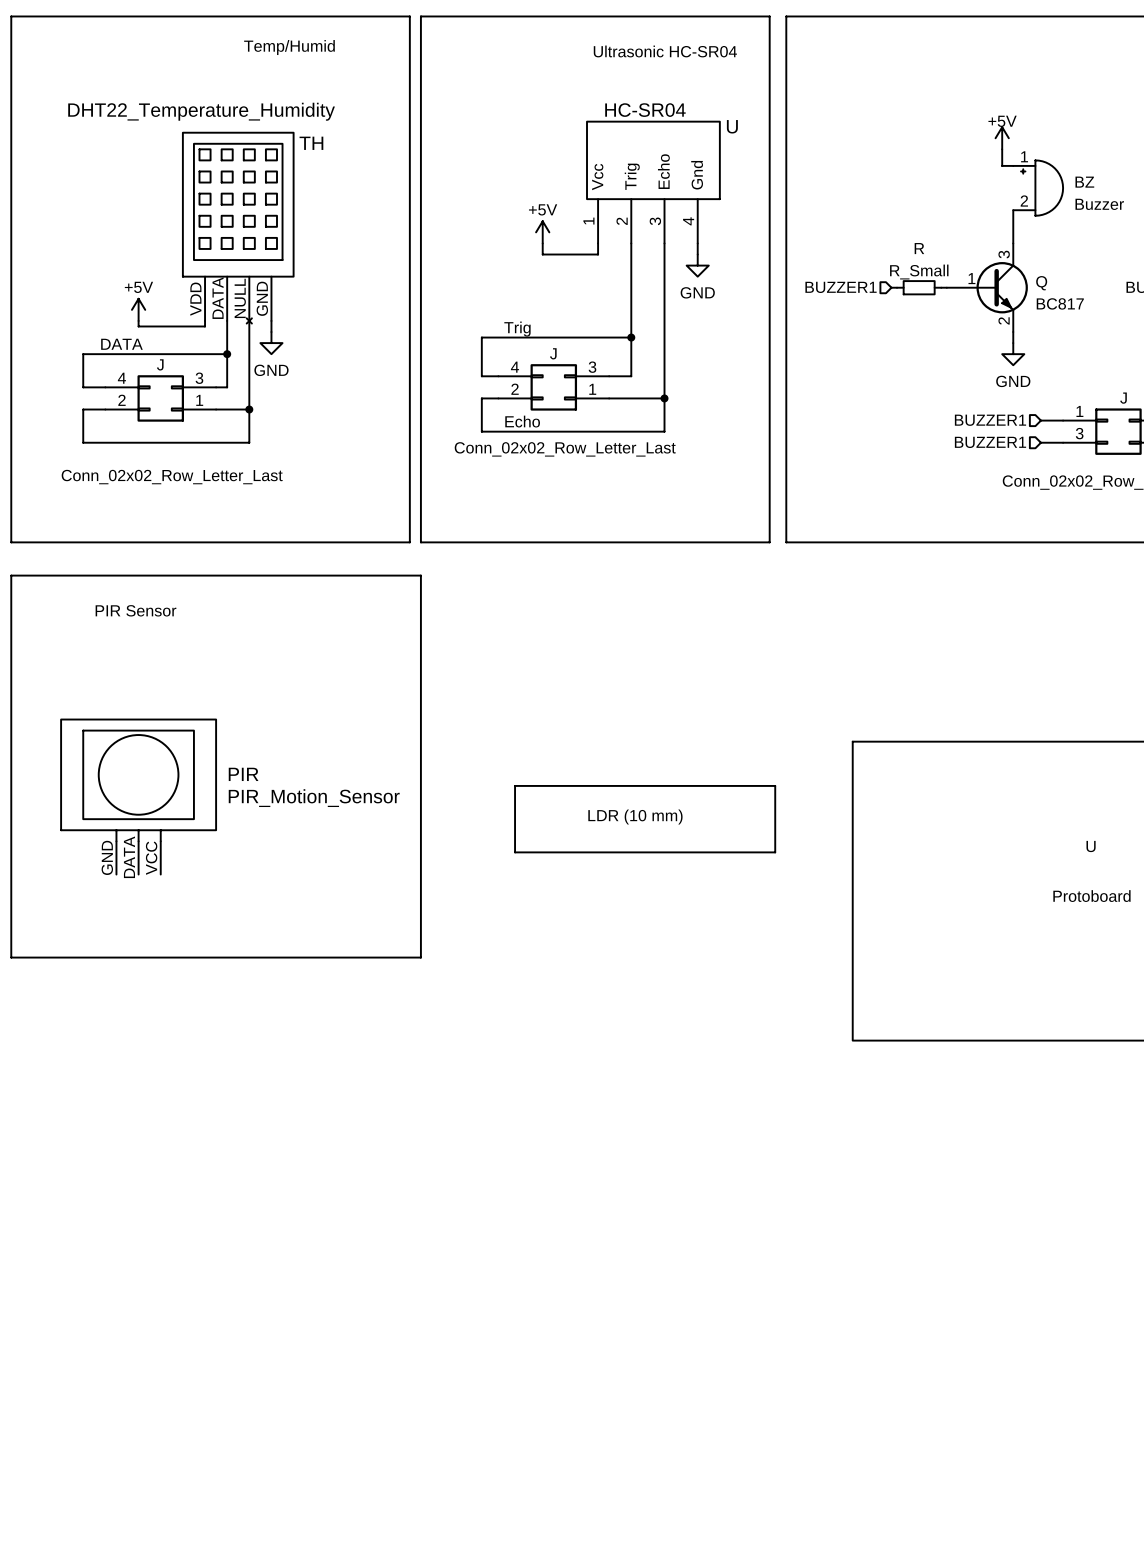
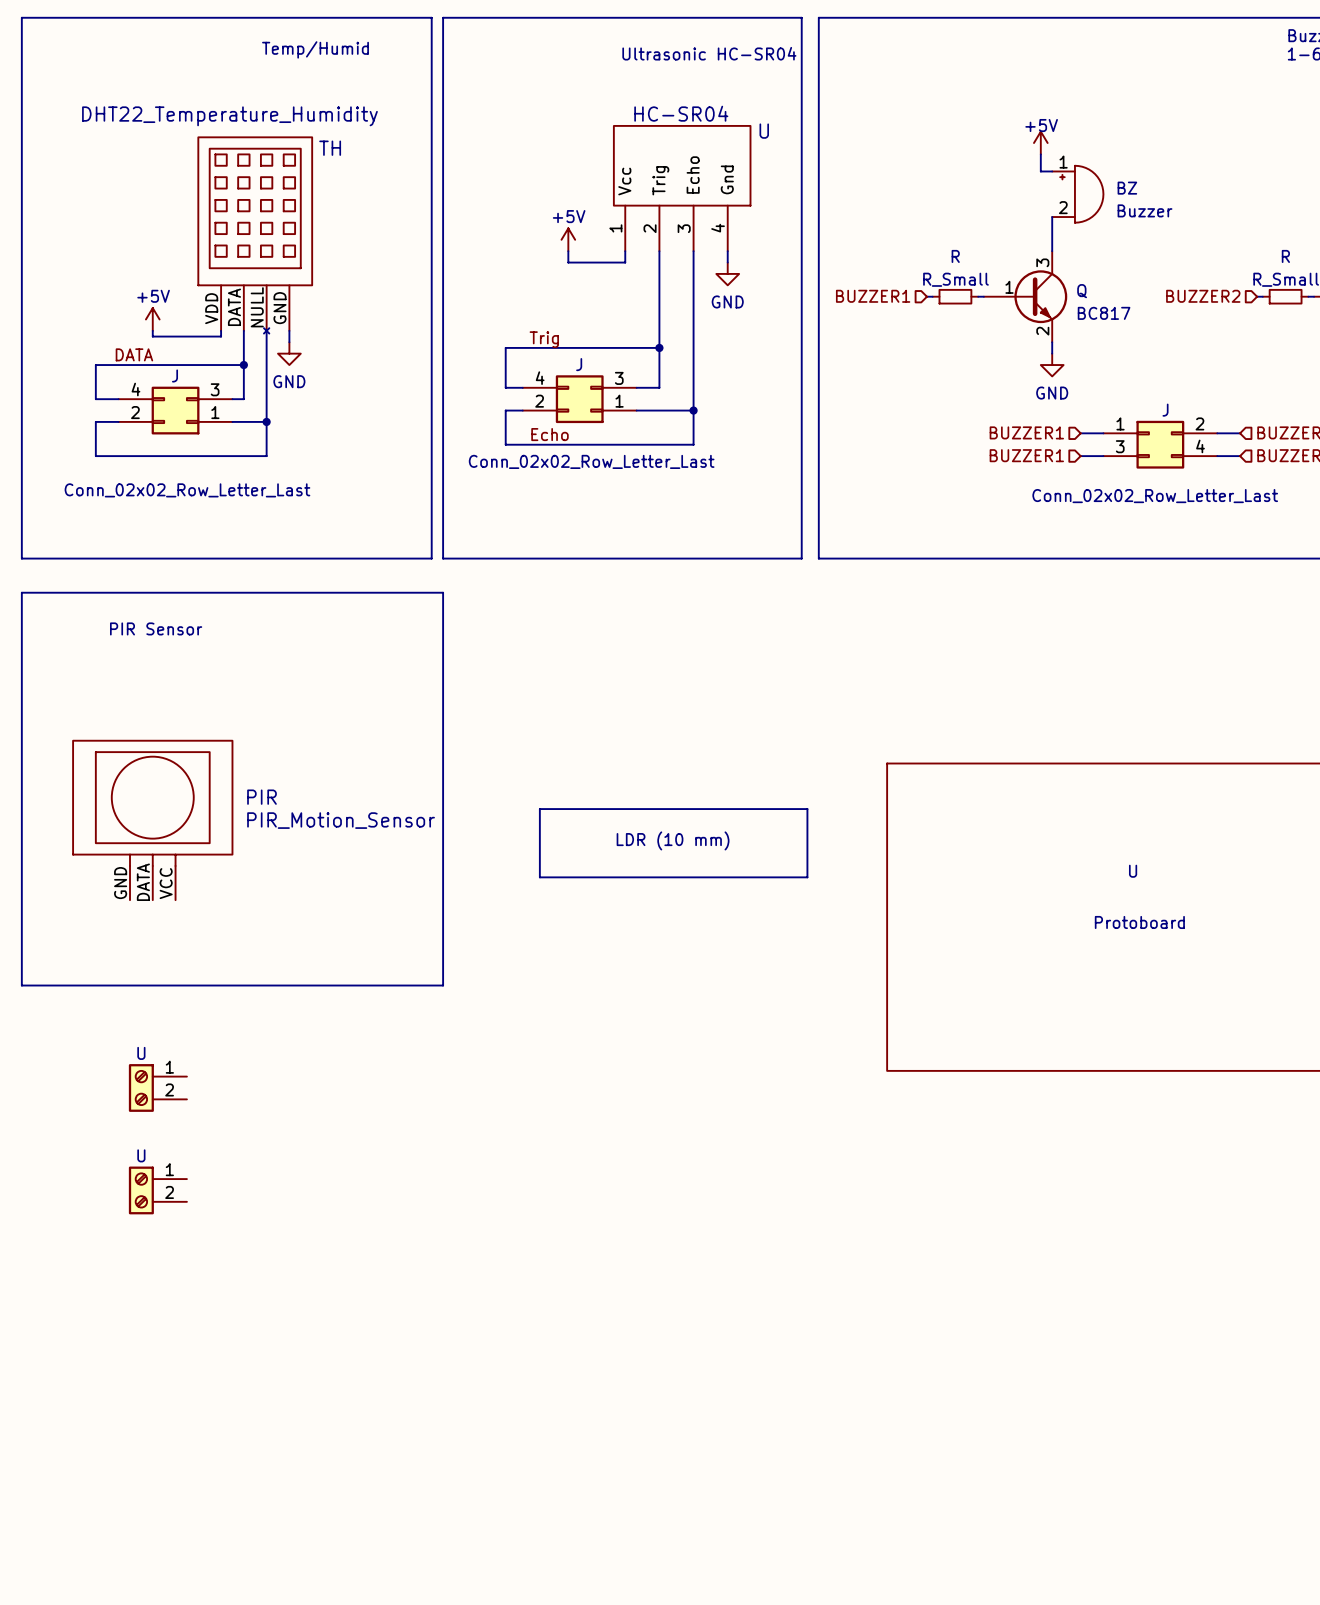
U: none -> (157, 1087)
U: none -> (157, 1190)

